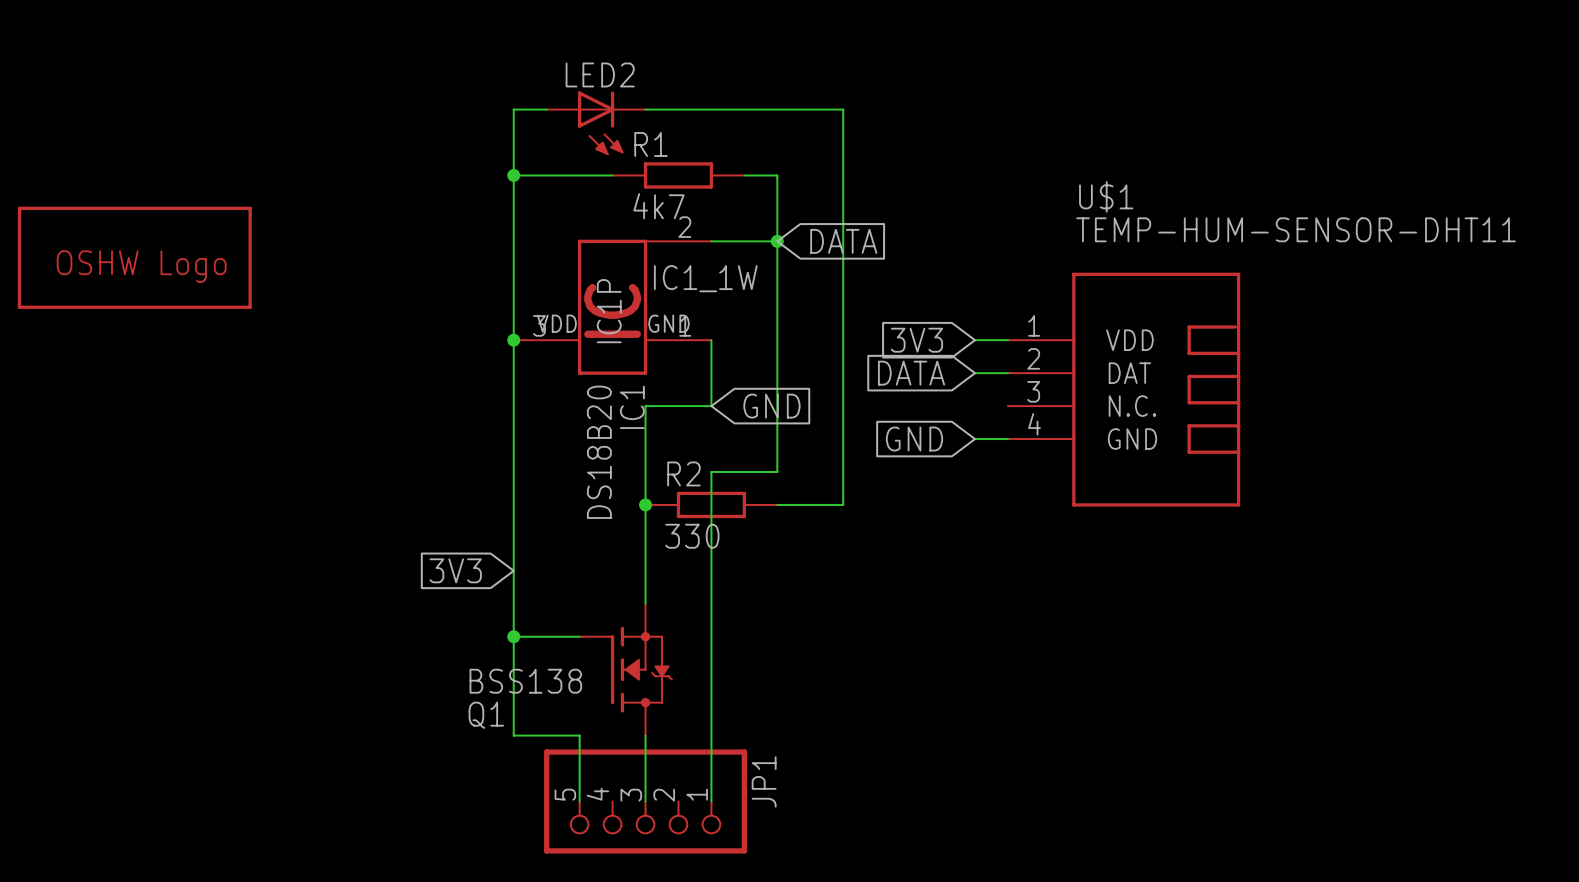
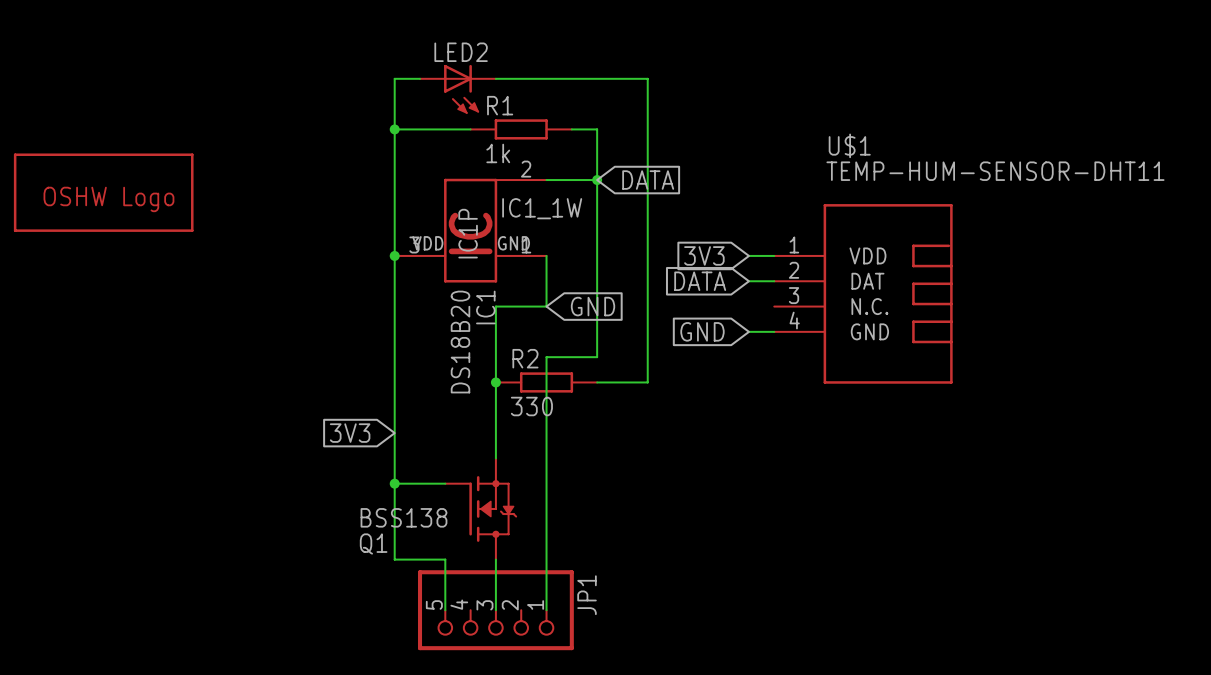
R1 value: 4k7 (658, 206) -> 1k (498, 153)

